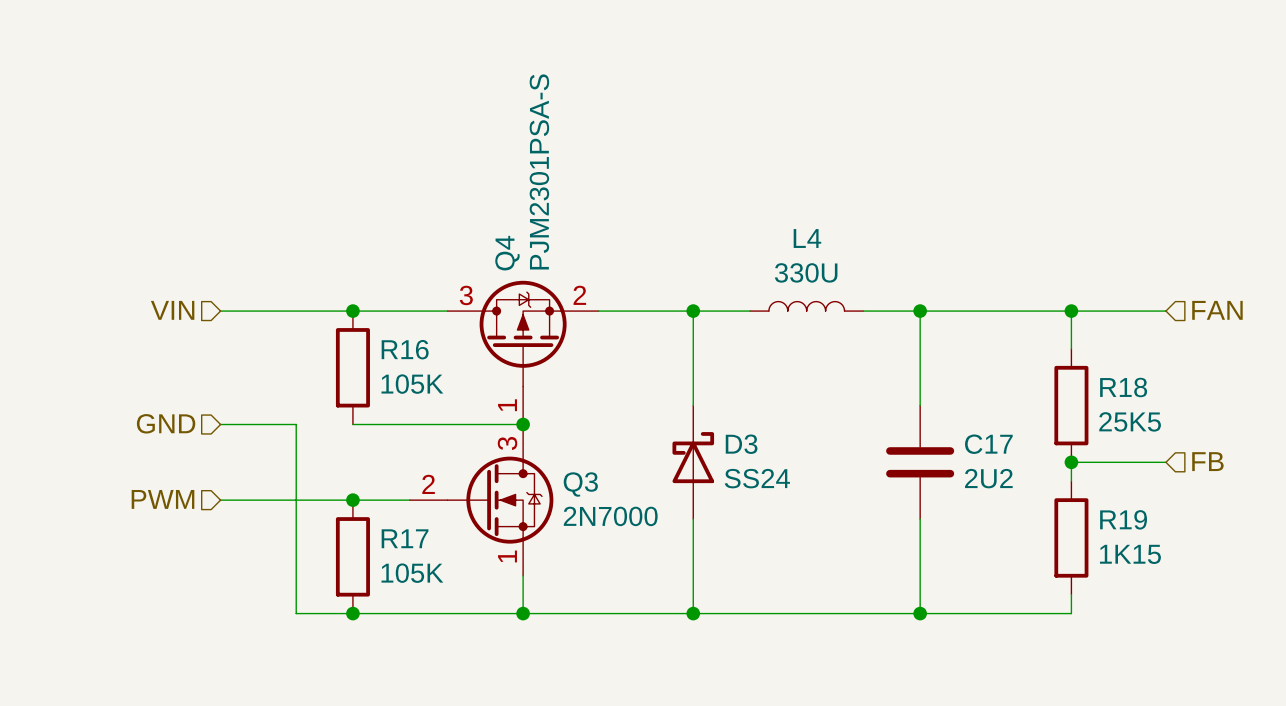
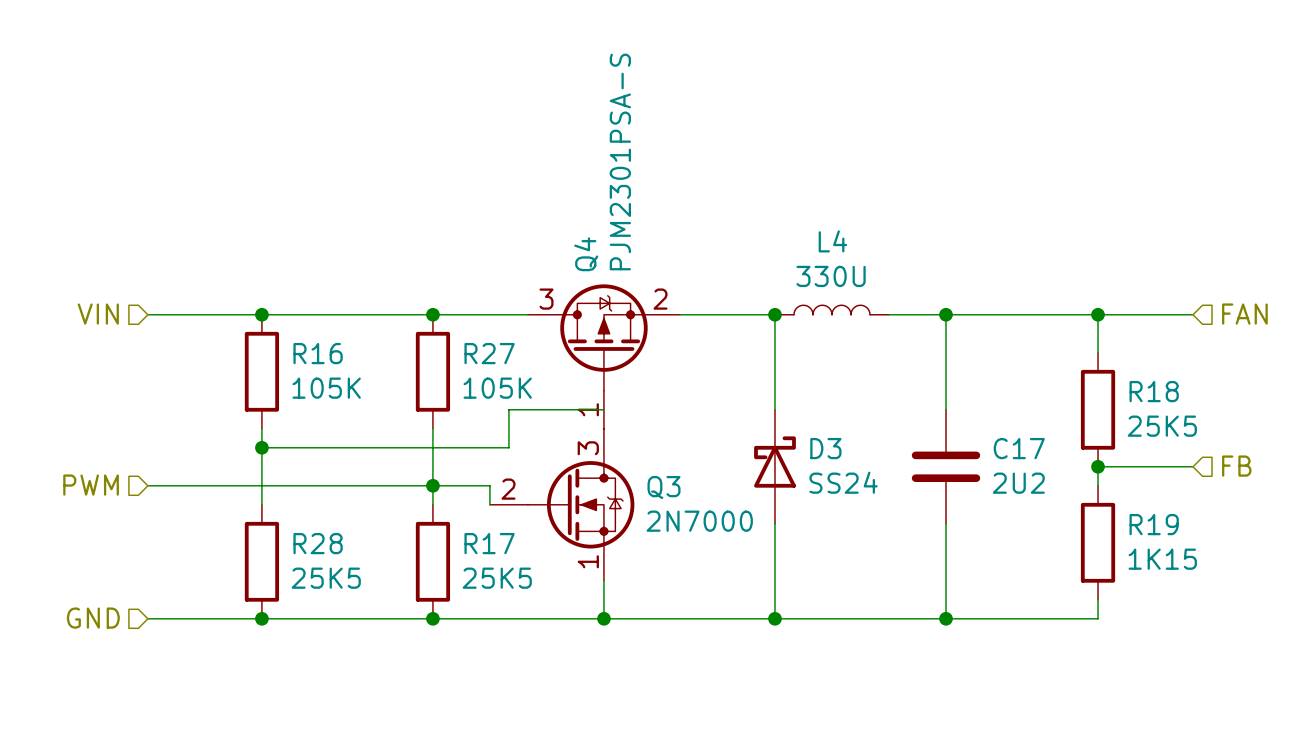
hierarchical label position: VIN (172, 310) -> VIN (98, 314)
wire: none -> (147, 314) (242, 314)
junction: none -> (261, 314)
junction: (352, 311) -> none
junction: none -> (432, 314)
wire: (693, 311) (693, 405) -> (774, 314) (774, 409)
junction position: (693, 311) -> (774, 314)
Q4 position: (523, 352) -> (603, 356)
R16 position: (352, 367) -> (261, 371)
R27: none -> 105K (432, 371)
wire: none -> (603, 409) (508, 409) (508, 447) (261, 447)
hierarchical label position: GND (166, 423) -> GND (93, 618)
wire: (220, 424) (296, 424) (296, 613) -> (147, 618) (318, 618)
wire: none -> (261, 428) (261, 504)
wire: (352, 424) (523, 424) -> none
junction: (523, 424) -> none
junction: none -> (261, 447)
D3 position: (693, 462) -> (774, 466)
wire: none -> (147, 485) (489, 485) (489, 504)
hierarchical label position: PWM (163, 499) -> PWM (91, 485)
wire: (220, 500) (409, 500) -> (432, 428) (432, 504)
junction position: (352, 500) -> (432, 485)
Q3 position: (481, 500) -> (562, 504)
wire: (693, 519) (693, 613) -> (774, 523) (774, 618)
R28: none -> 25K5 (261, 561)
R17 position: (352, 556) -> (432, 561)
R17 value: 105K (412, 573) -> 25K5 (497, 578)
wire: (523, 575) (523, 613) -> (603, 580) (603, 618)
junction: none -> (261, 618)
junction: (352, 613) -> none
junction: none -> (432, 618)
junction: (523, 613) -> none
junction: none -> (603, 618)
junction: (693, 613) -> none
junction: none -> (774, 618)

